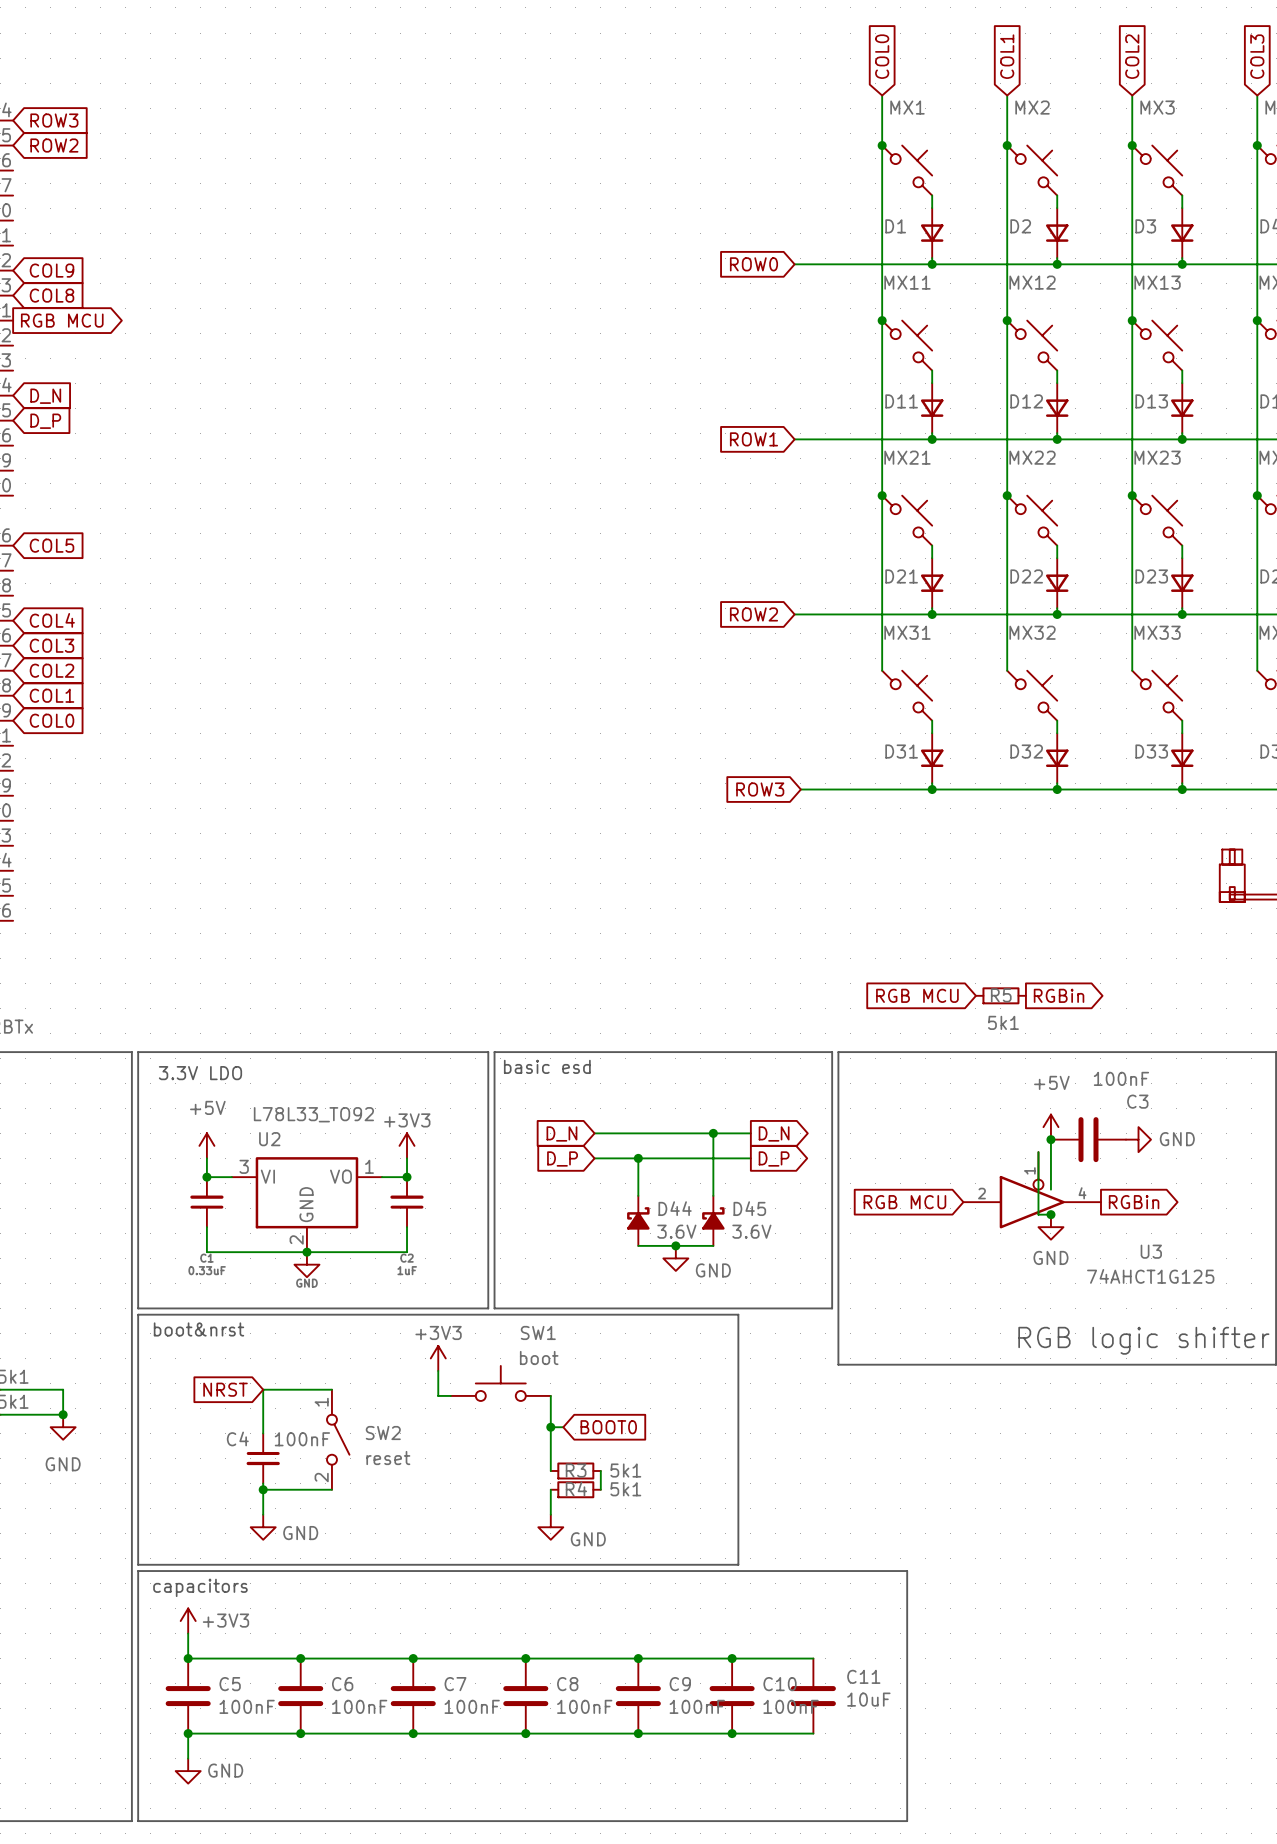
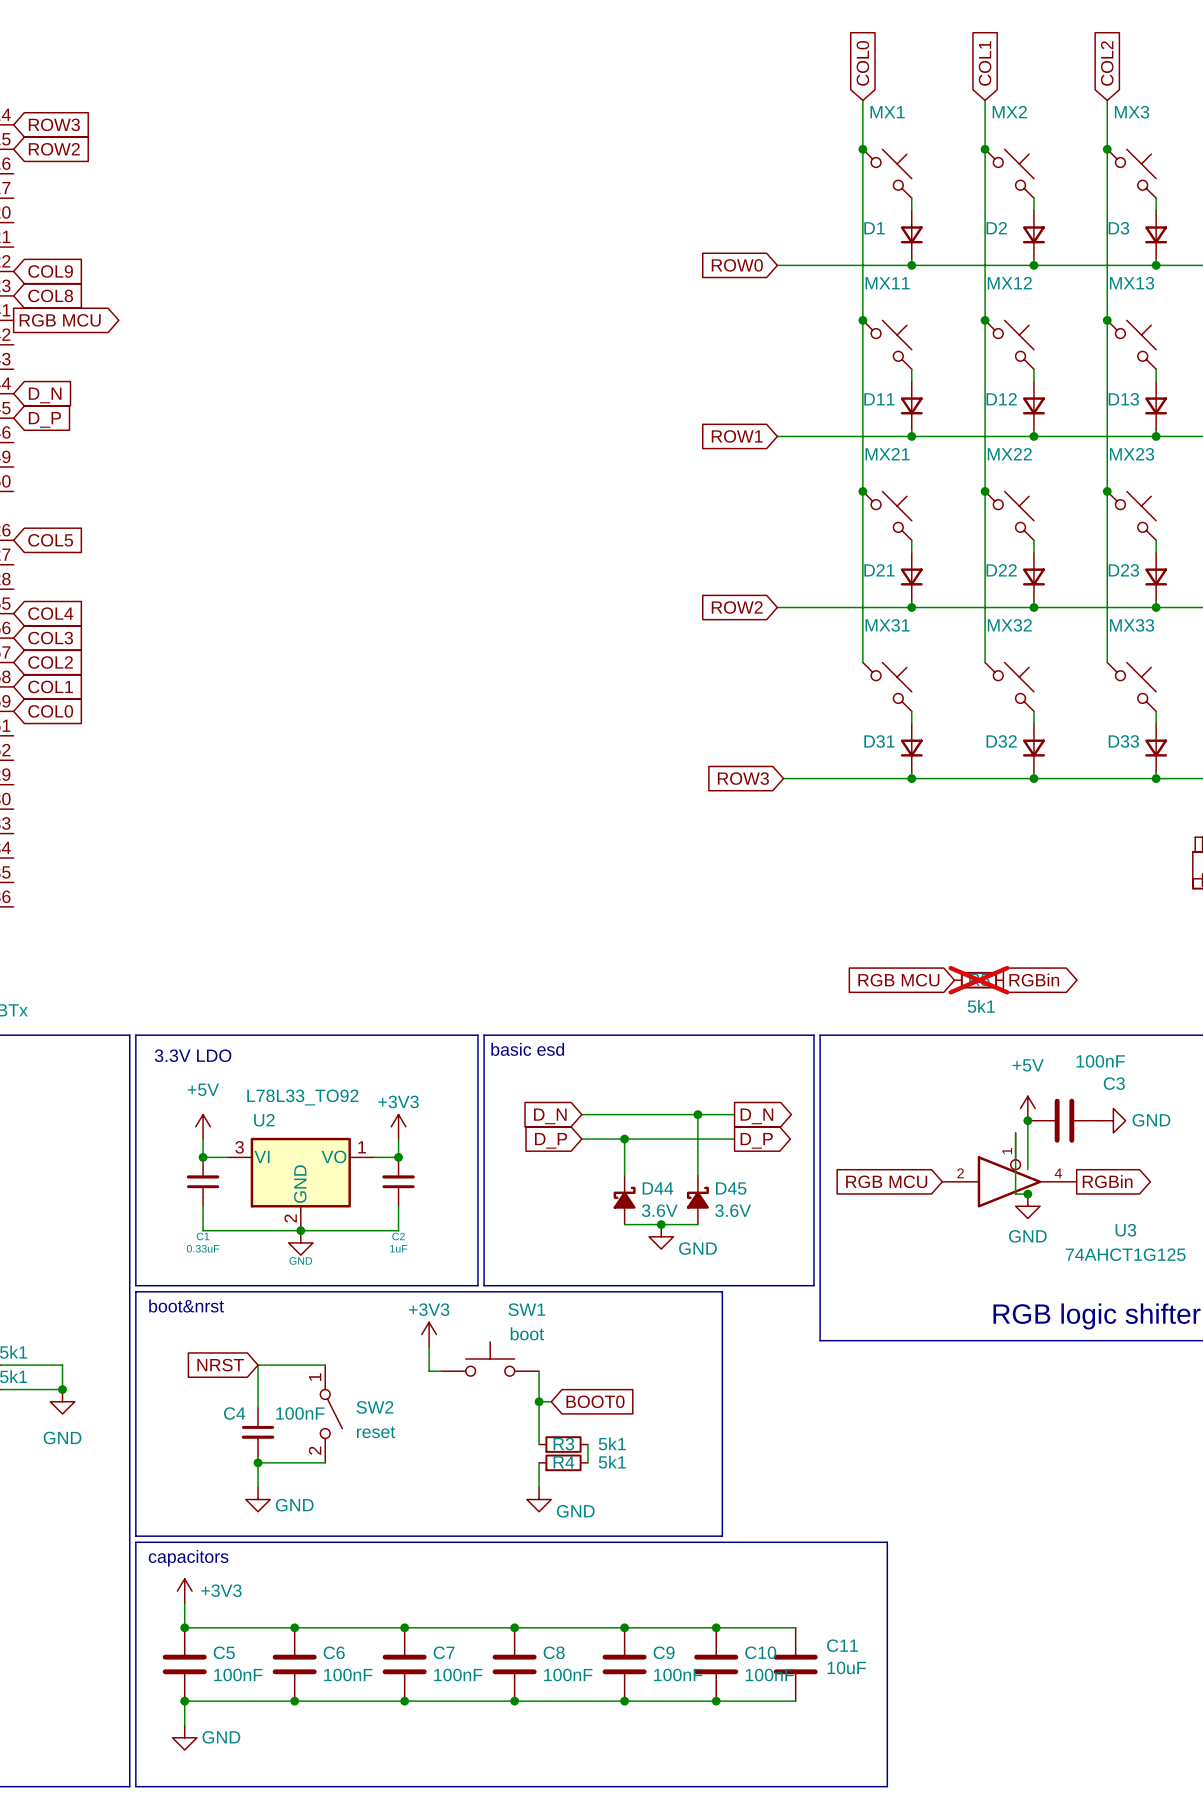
R5 do-not-place cross: none -> (978, 980)

